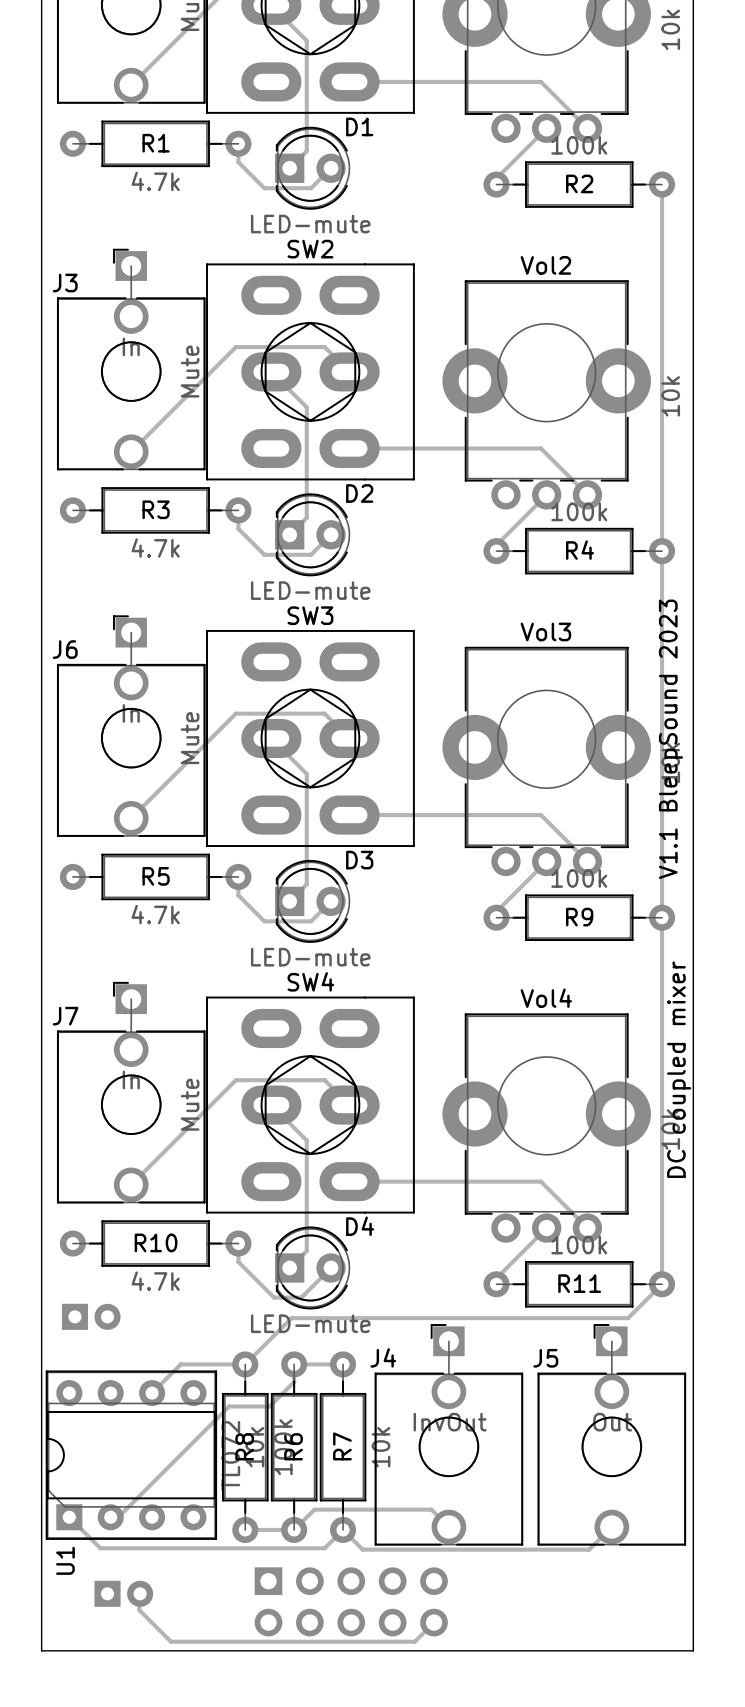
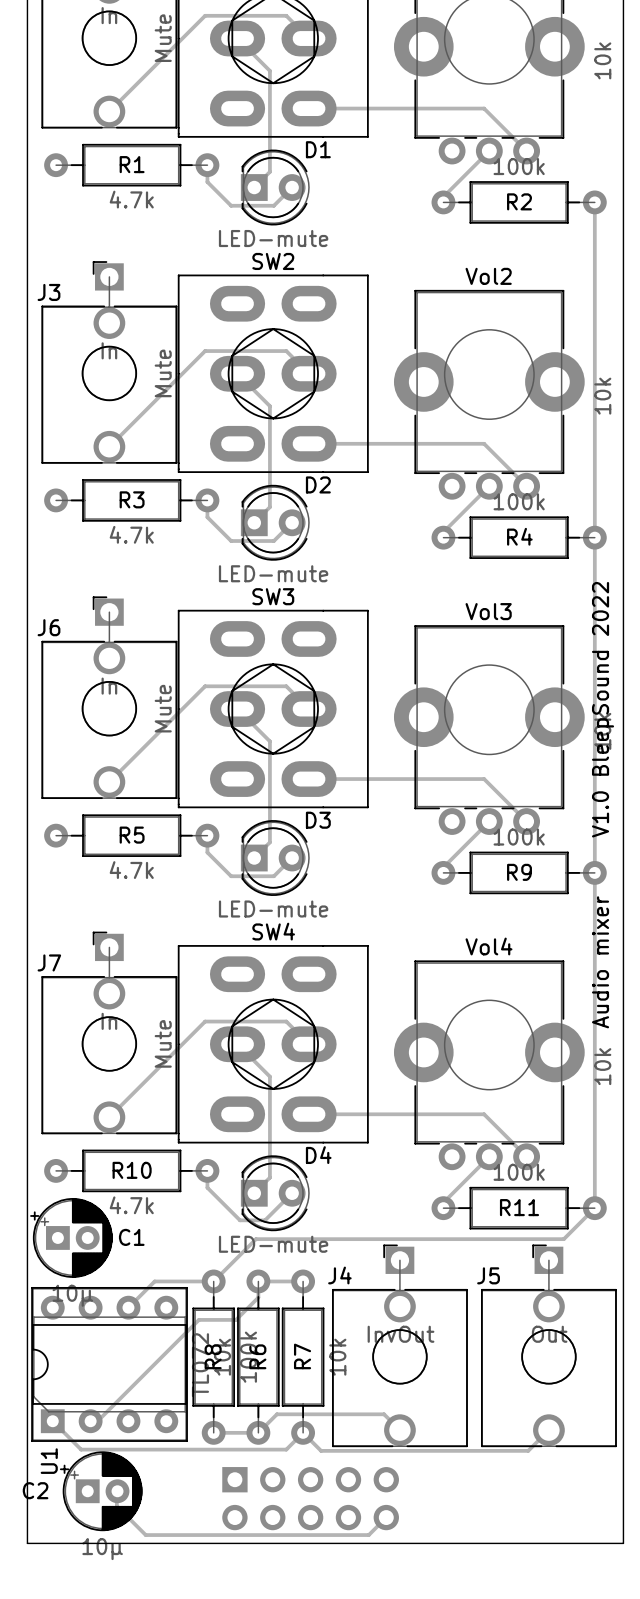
text: V1.1 BleepSound 2023 (670, 739) -> V1.0 BleepSound 2022 (603, 709)
text: none -> Audio mixer (600, 962)
text: DC coupled mixer (679, 1069) -> none
C1 side: bottom (91, 1316) -> top (71, 1237)
C2 side: bottom (123, 1593) -> top (101, 1491)

